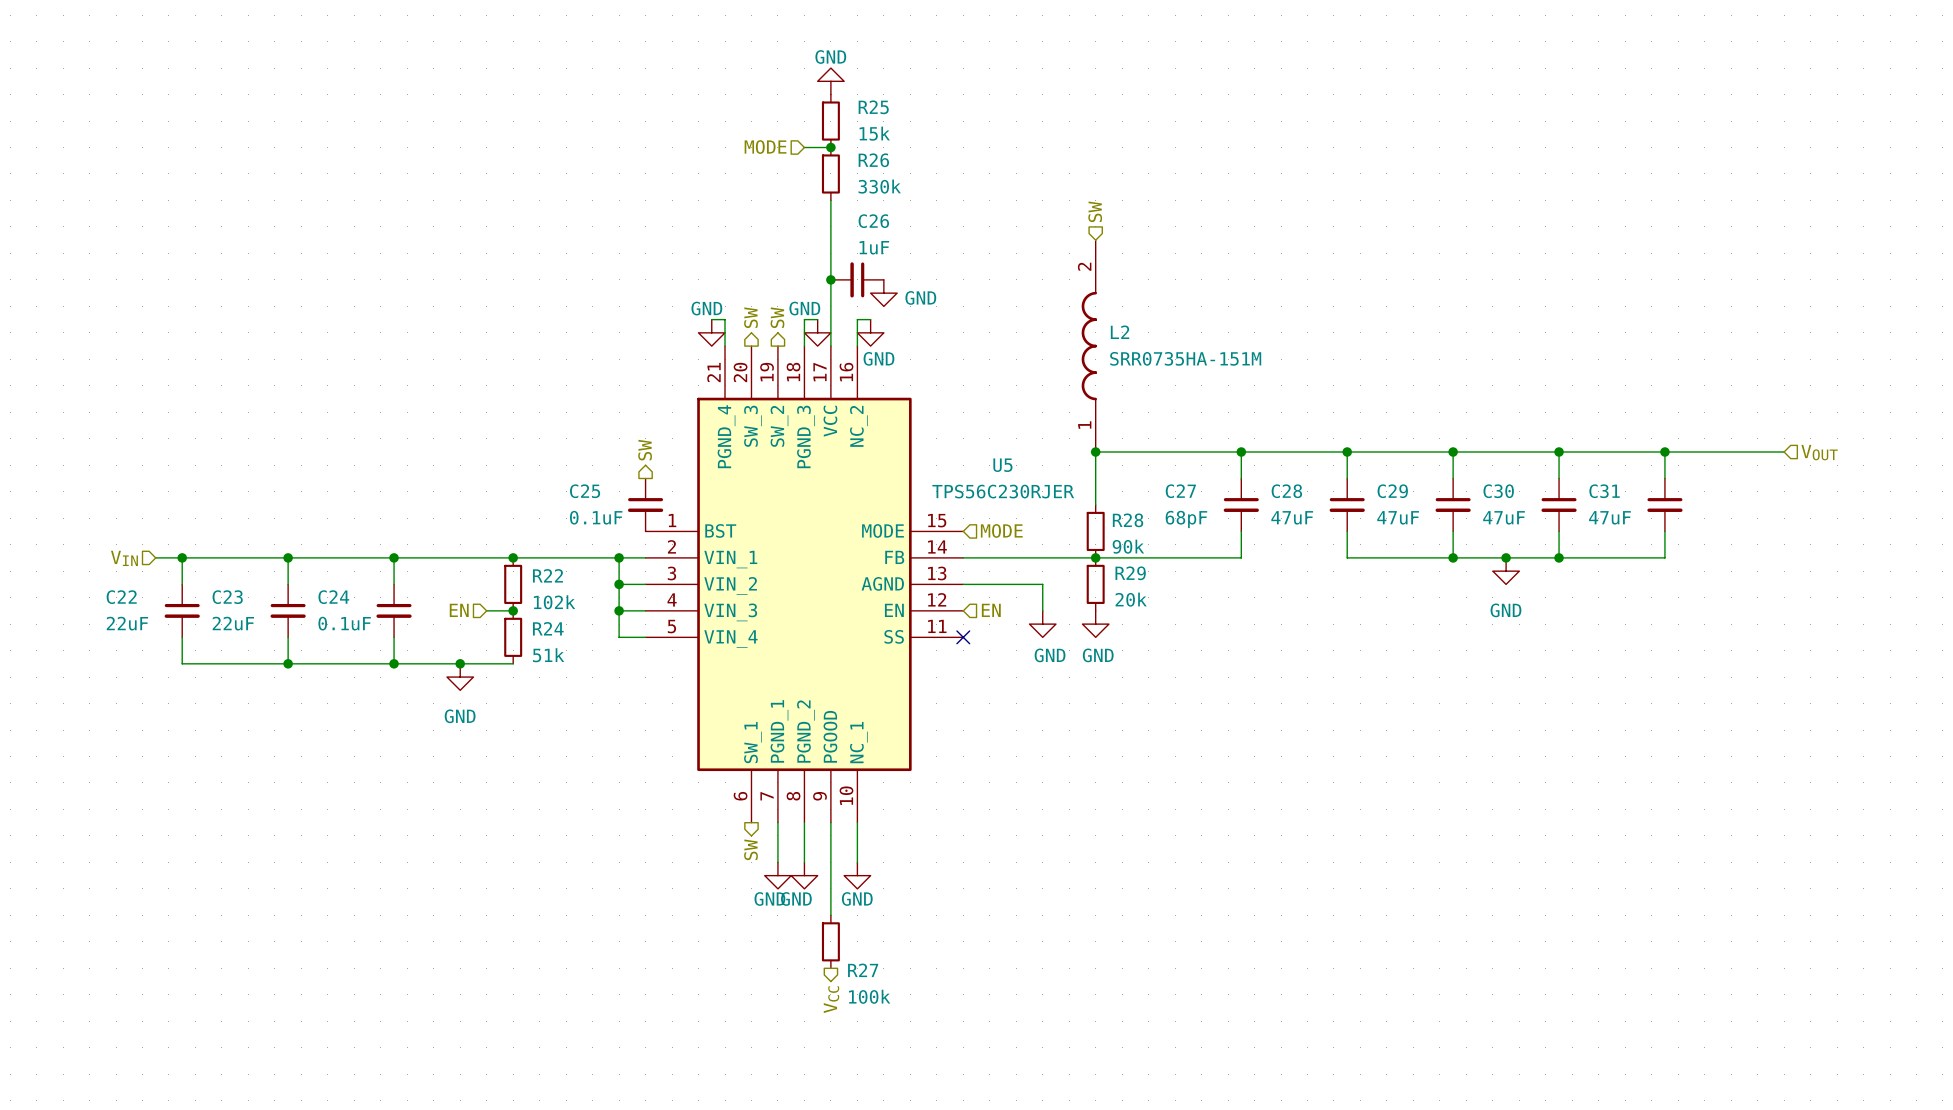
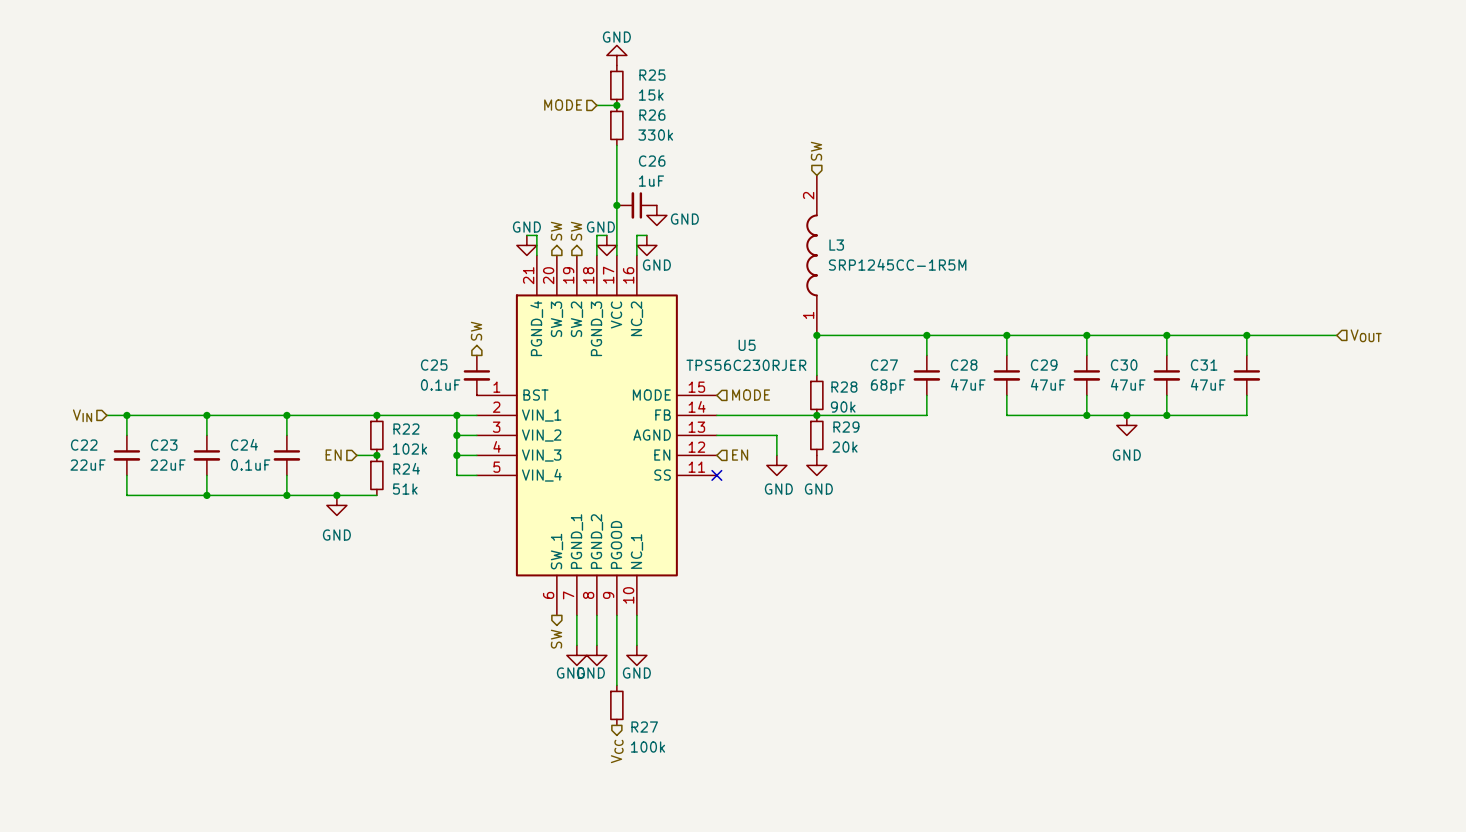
L2 name: L2 (1120, 332) -> L3 (836, 245)
L2 value: SRR0735HA-151M (1185, 358) -> SRP1245CC-1R5M (897, 264)

